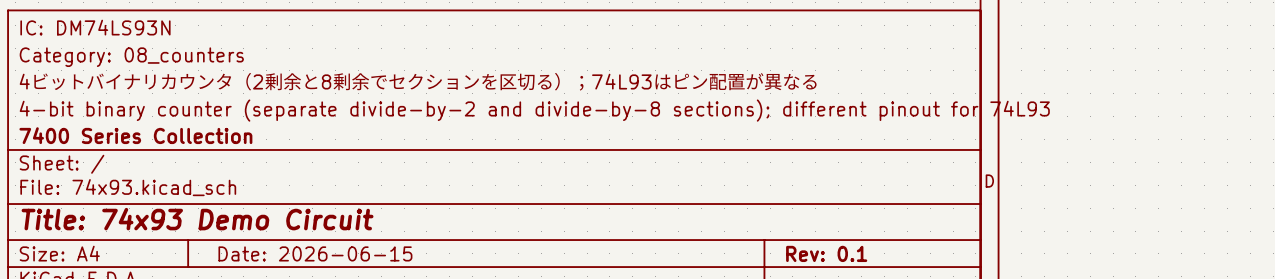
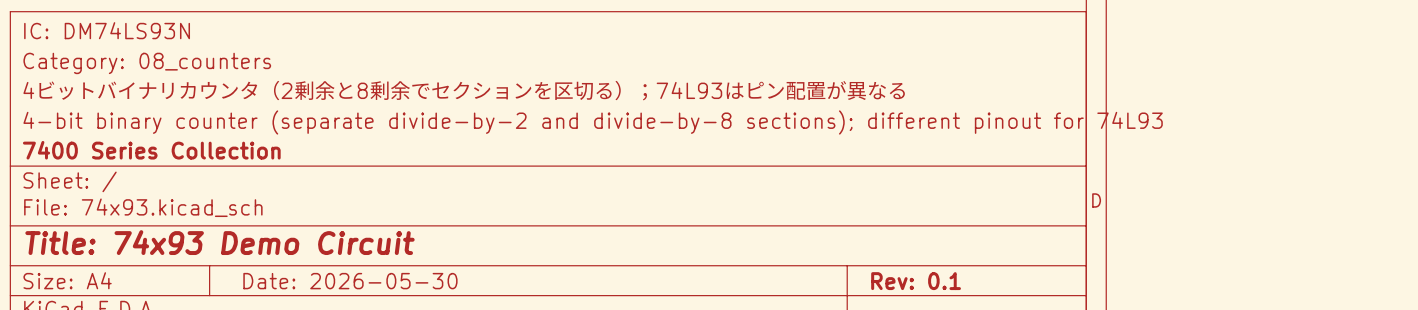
title block: Date: 2026-06-15 (315, 253) -> Date: 2026-05-30 (350, 281)

